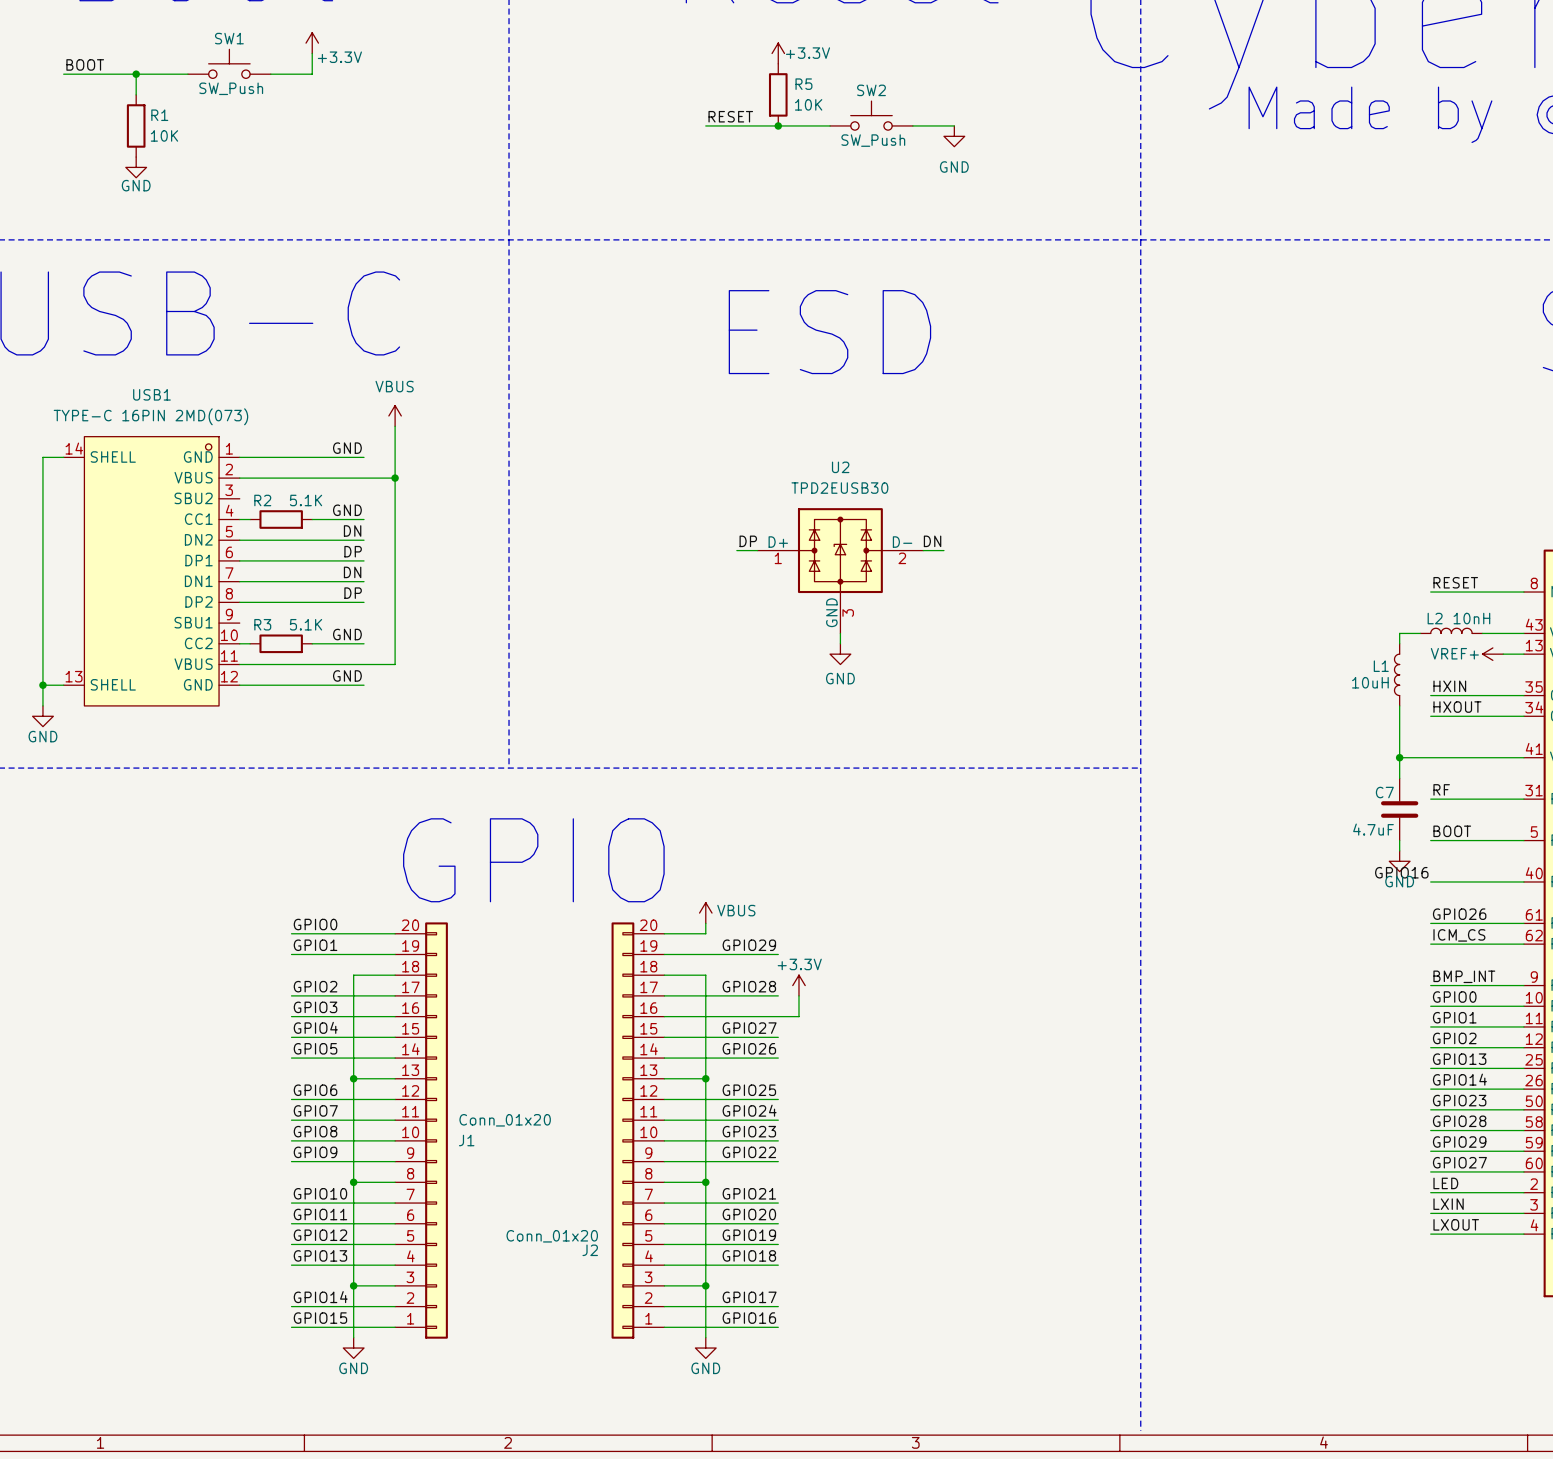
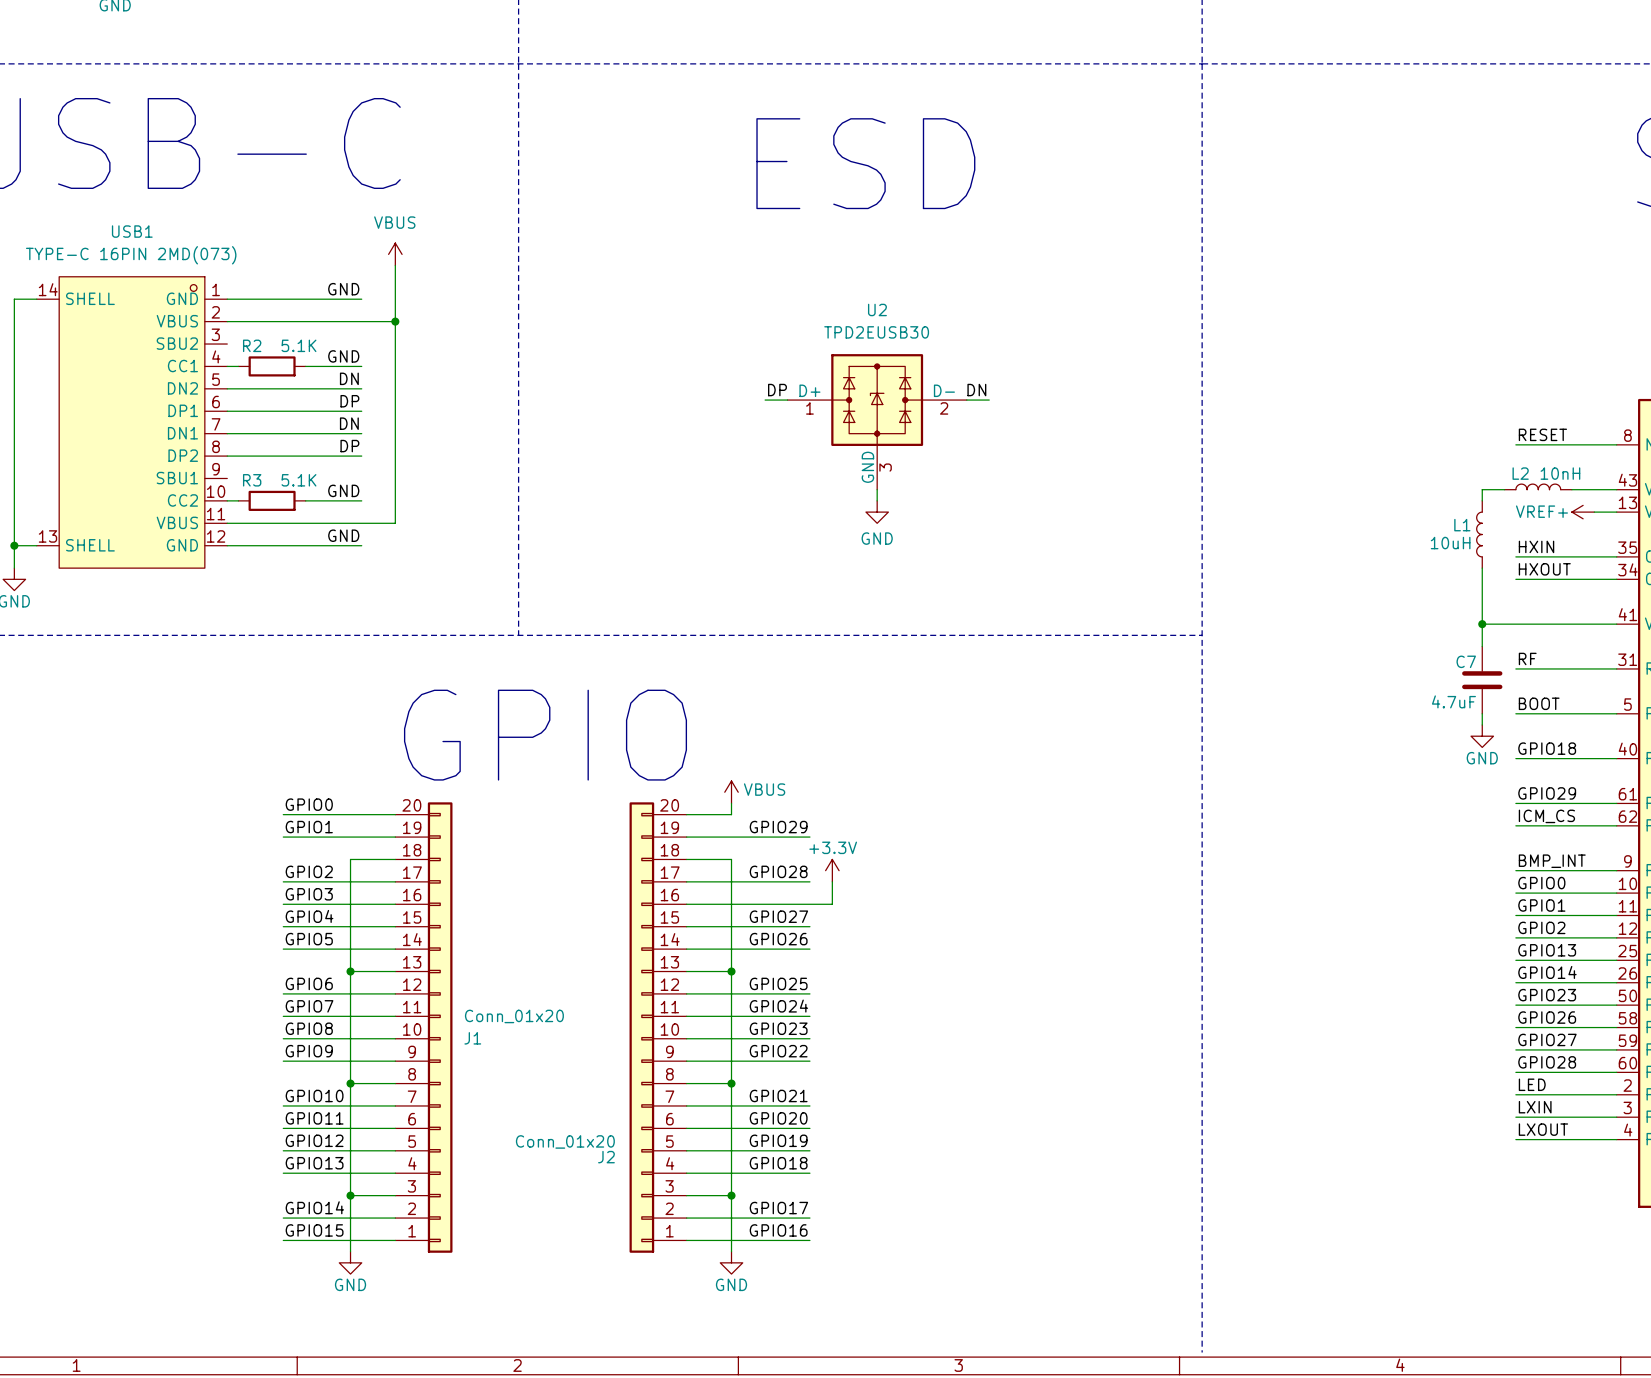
label: GPIO16 (1401, 872) -> GPIO18 (1547, 748)
label: GPIO26 (1459, 914) -> GPIO29 (1547, 793)
label: GPIO28 (1459, 1121) -> GPIO26 (1547, 1017)
label: GPIO29 (1459, 1142) -> GPIO27 (1547, 1039)
label: GPIO27 (1459, 1162) -> GPIO28 (1547, 1062)

